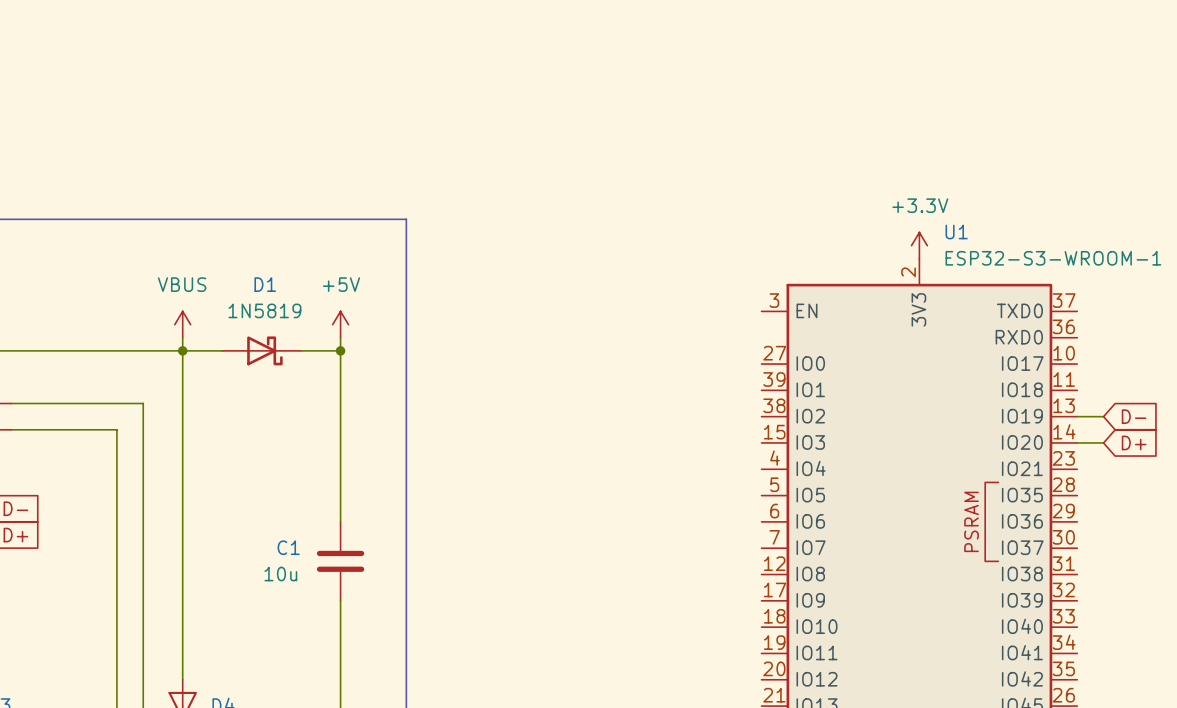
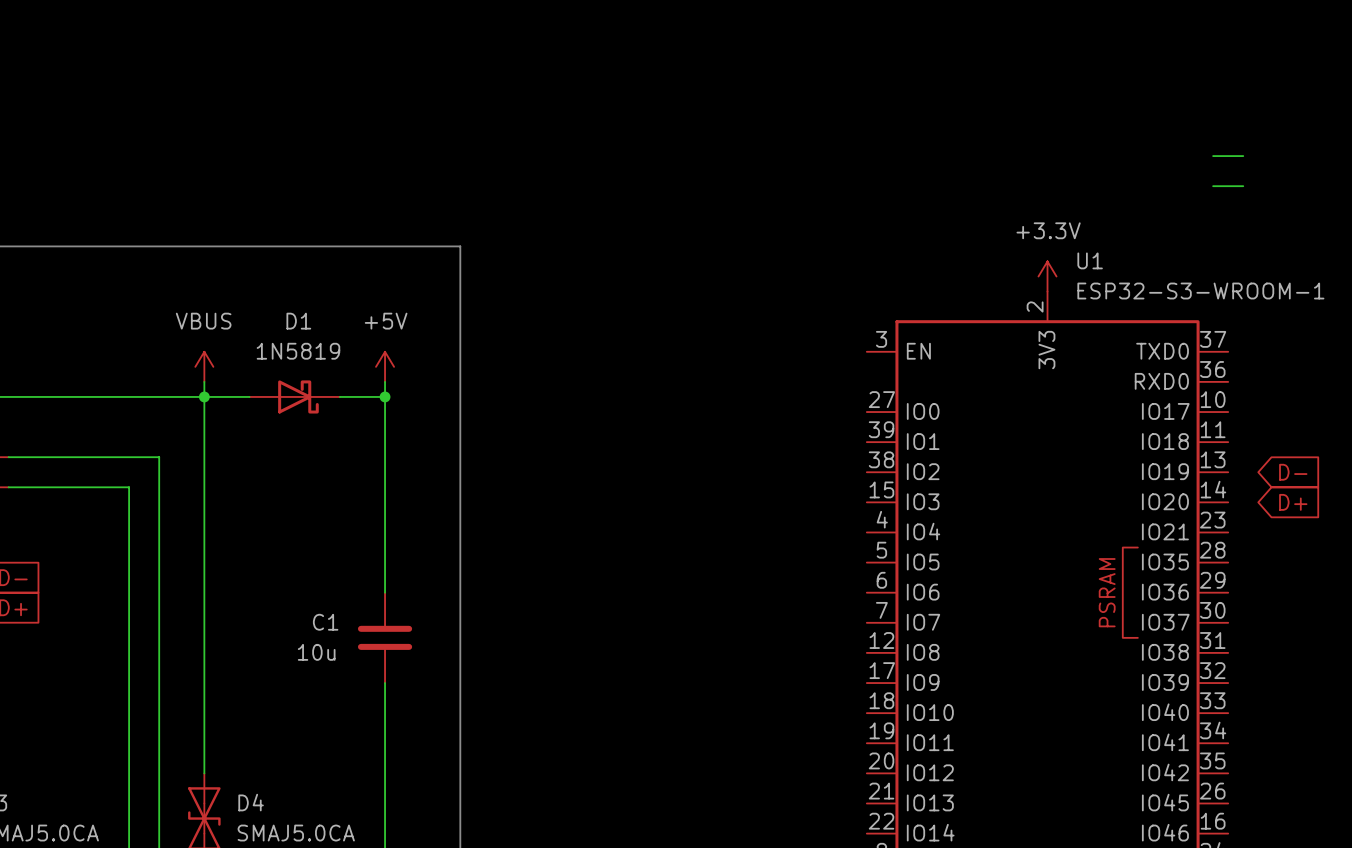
wire: none -> (1213, 156) (1243, 156)
wire: (1077, 416) (1103, 416) -> (1213, 186) (1243, 186)
wire: (1077, 442) (1103, 442) -> none

